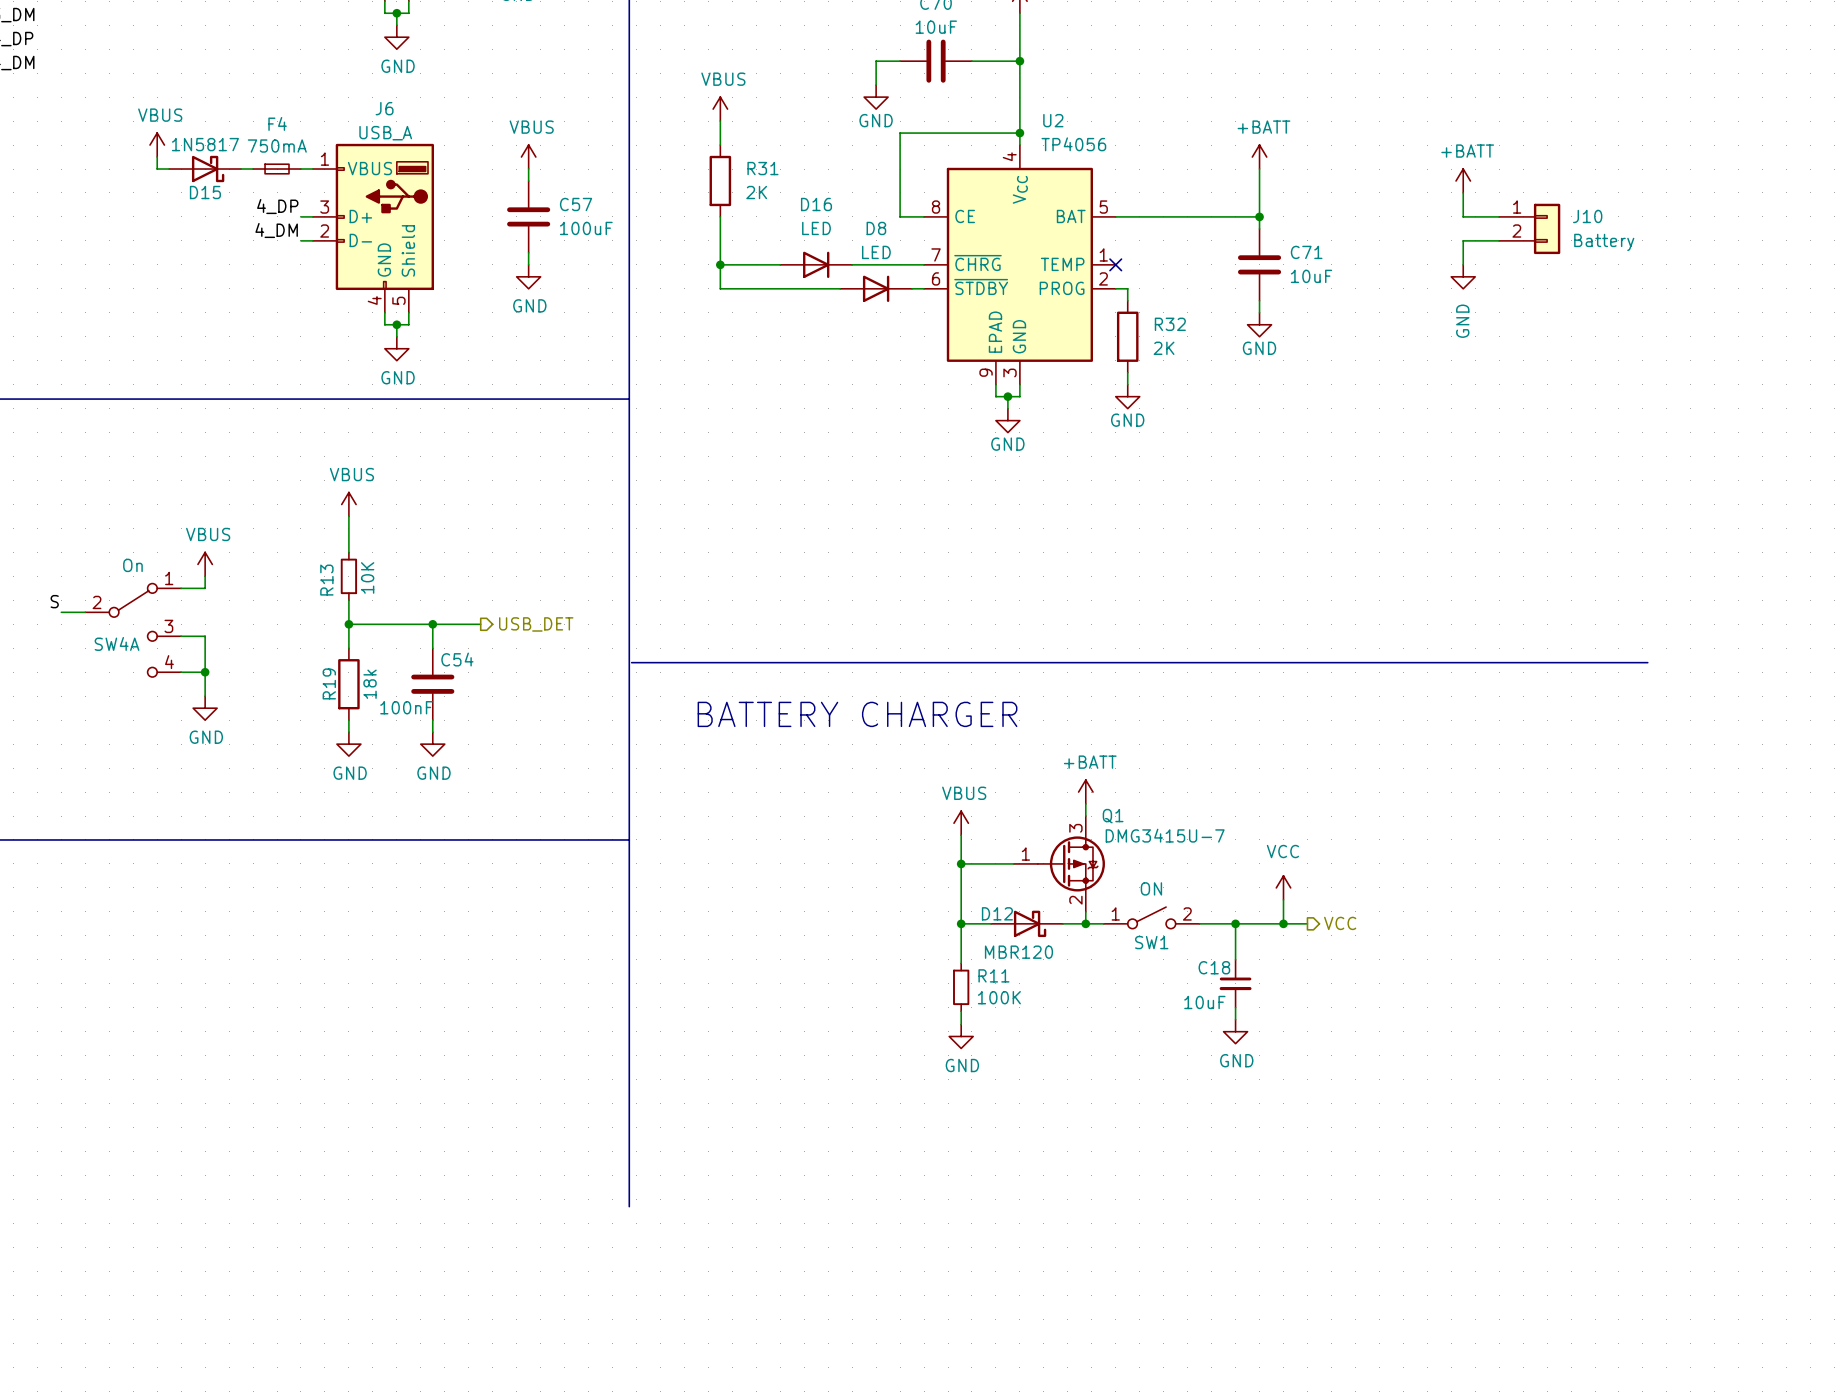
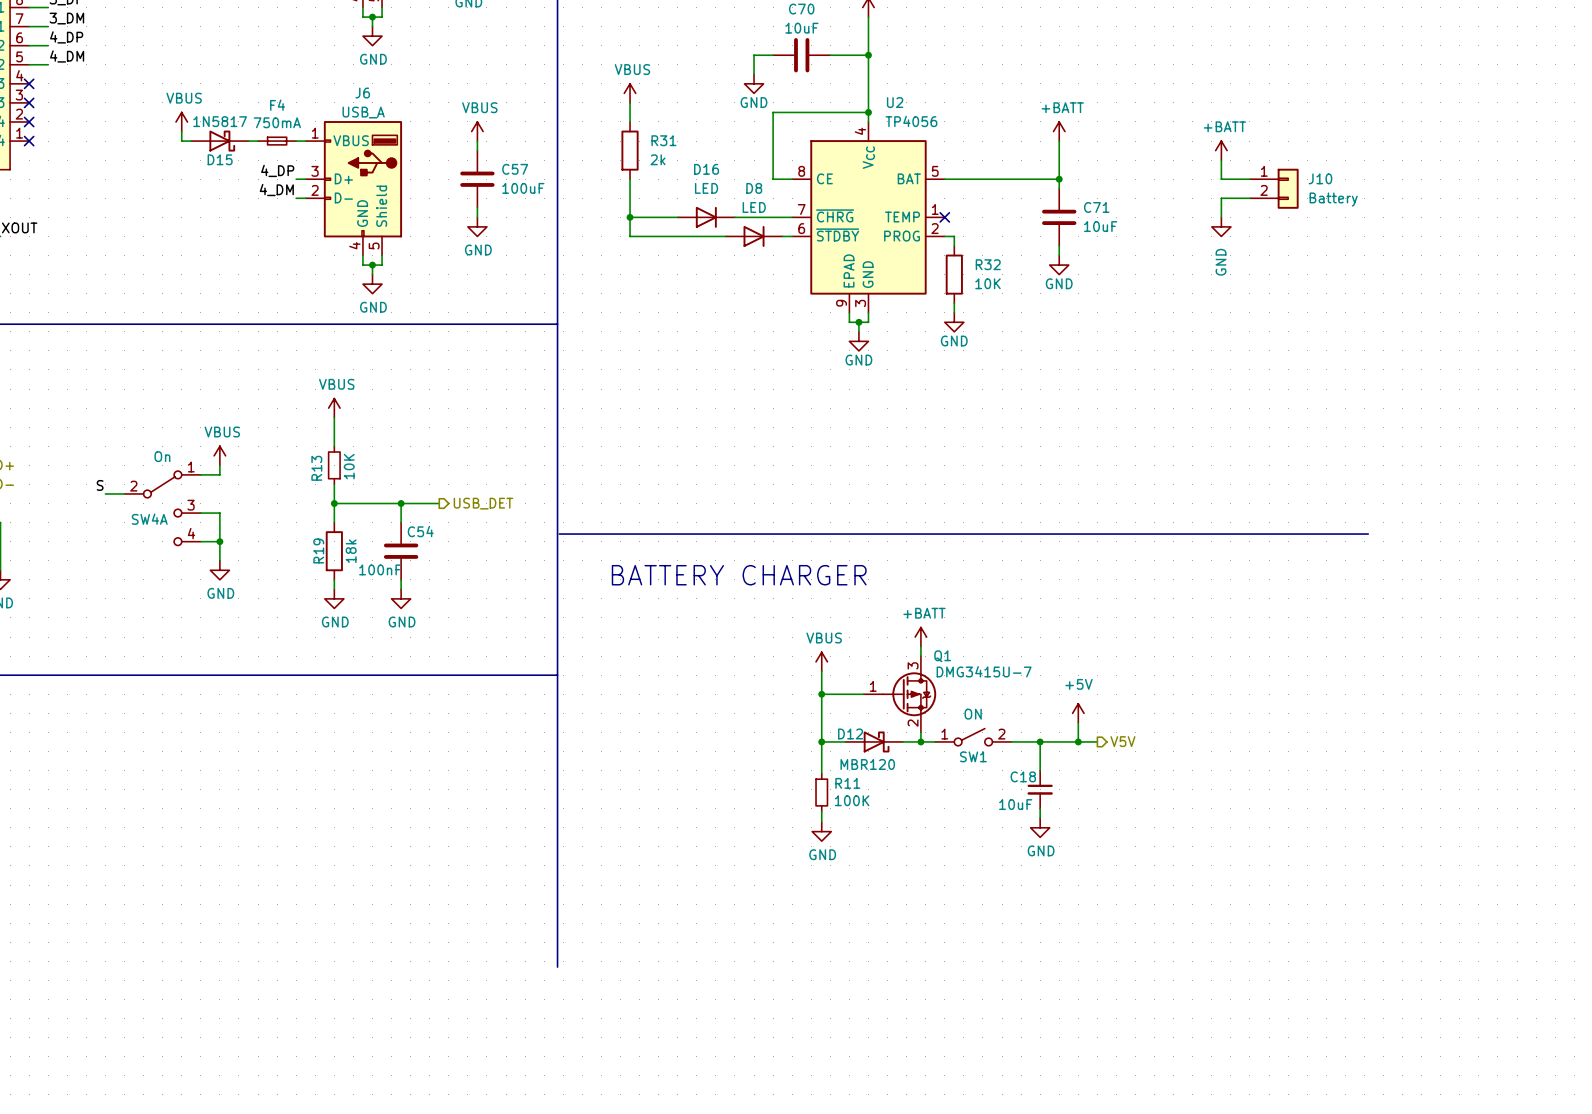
R31 value: 2K (756, 192) -> 2k (658, 159)
R32 value: 2K (1164, 348) -> 10K (988, 283)
power symbol: VCC (1283, 887) -> +5V (1078, 713)
hierarchical label: VCC (1340, 923) -> V5V (1122, 741)

